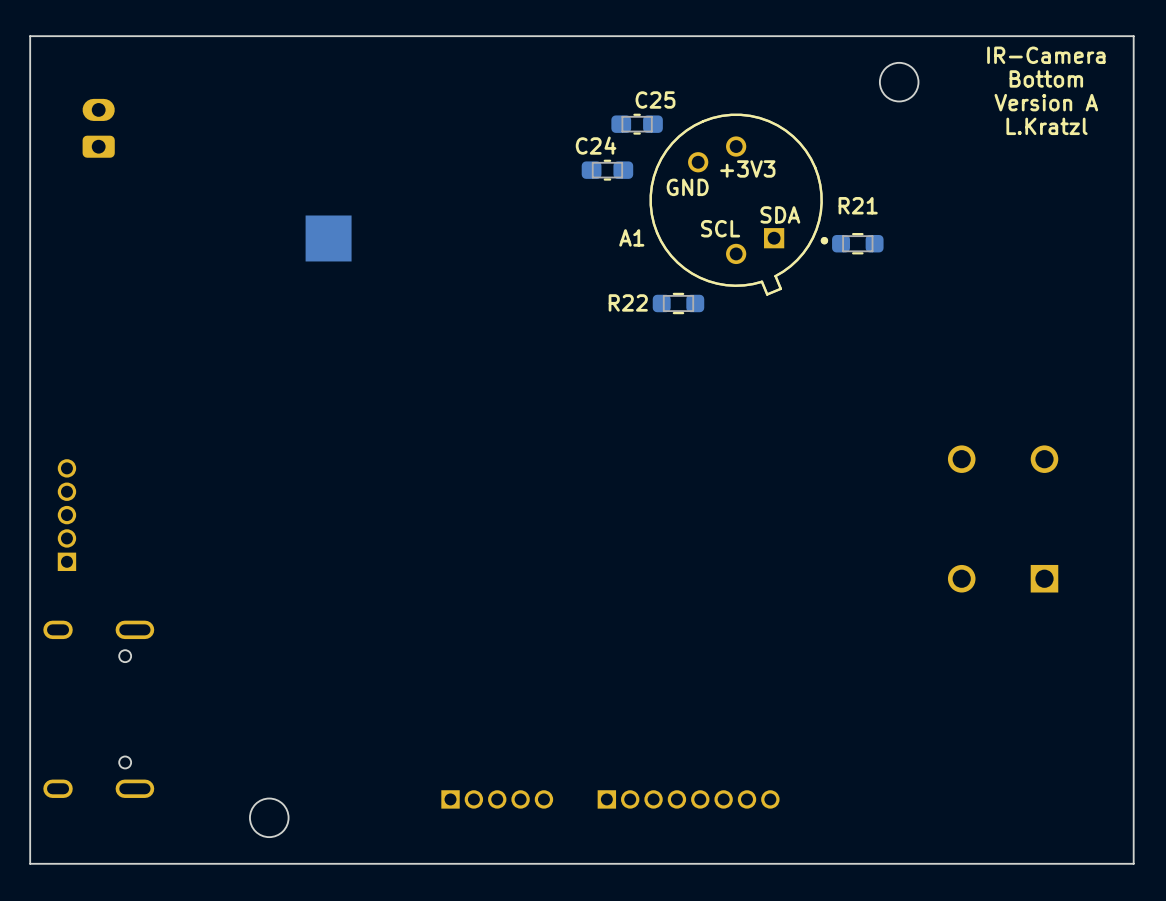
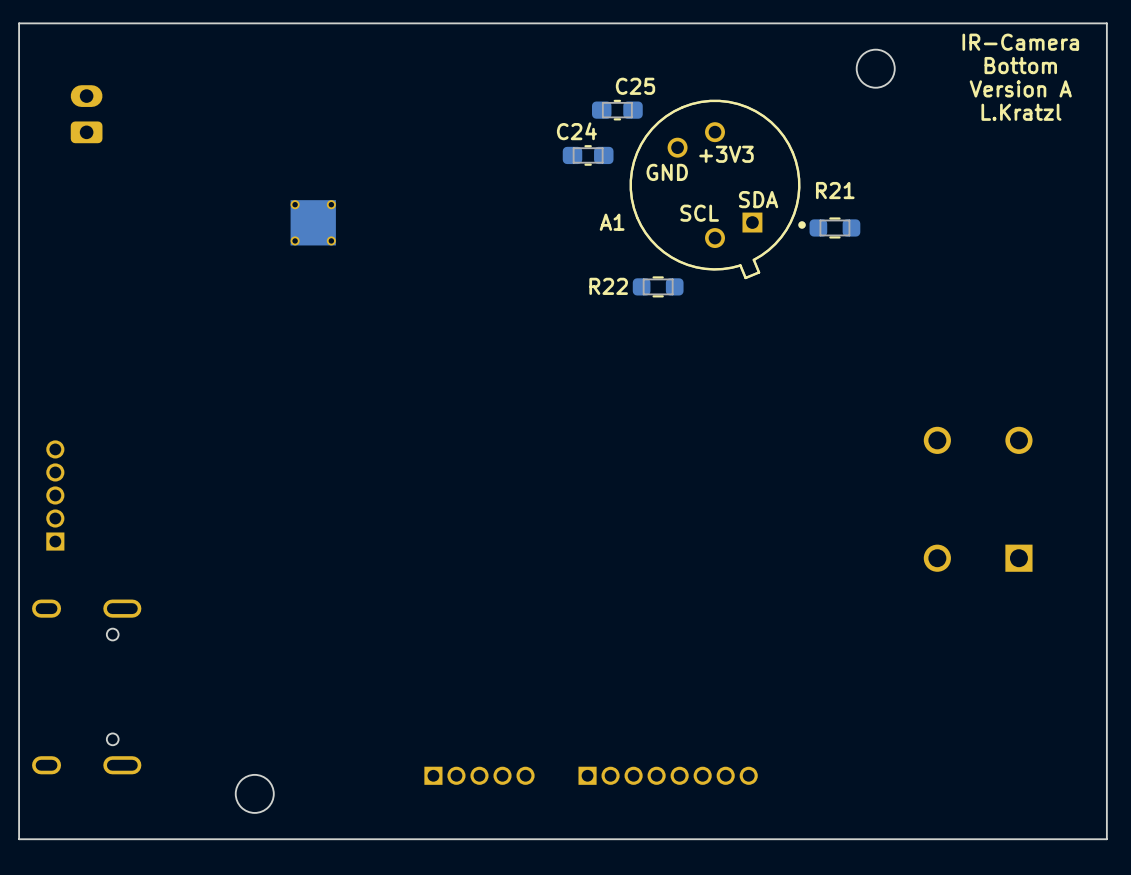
part footprint: [305, 215, 352, 262] -> [290, 200, 336, 246]

